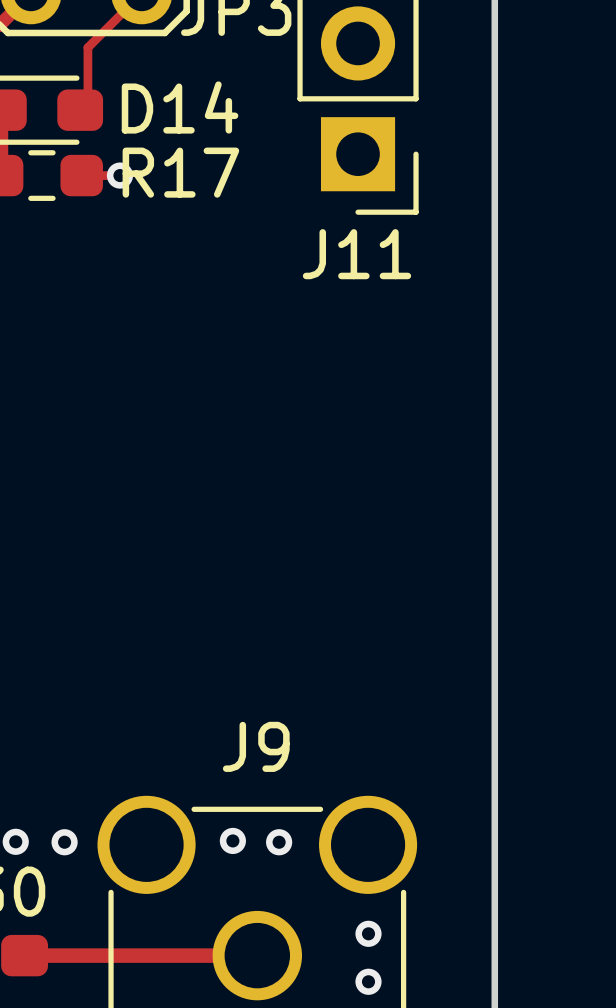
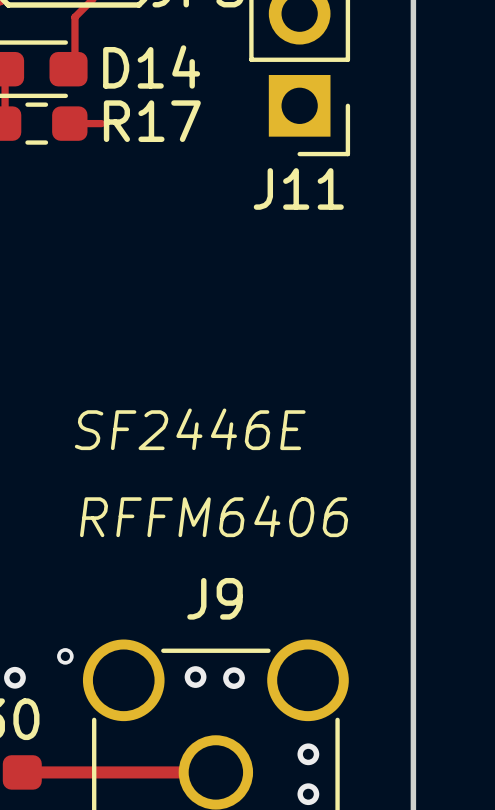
via: (119, 175) -> none
text: none -> SF2446E (190, 429)
text: none -> RFFM6406 (214, 516)
via: none -> (65, 656)
via: (64, 842) -> none

